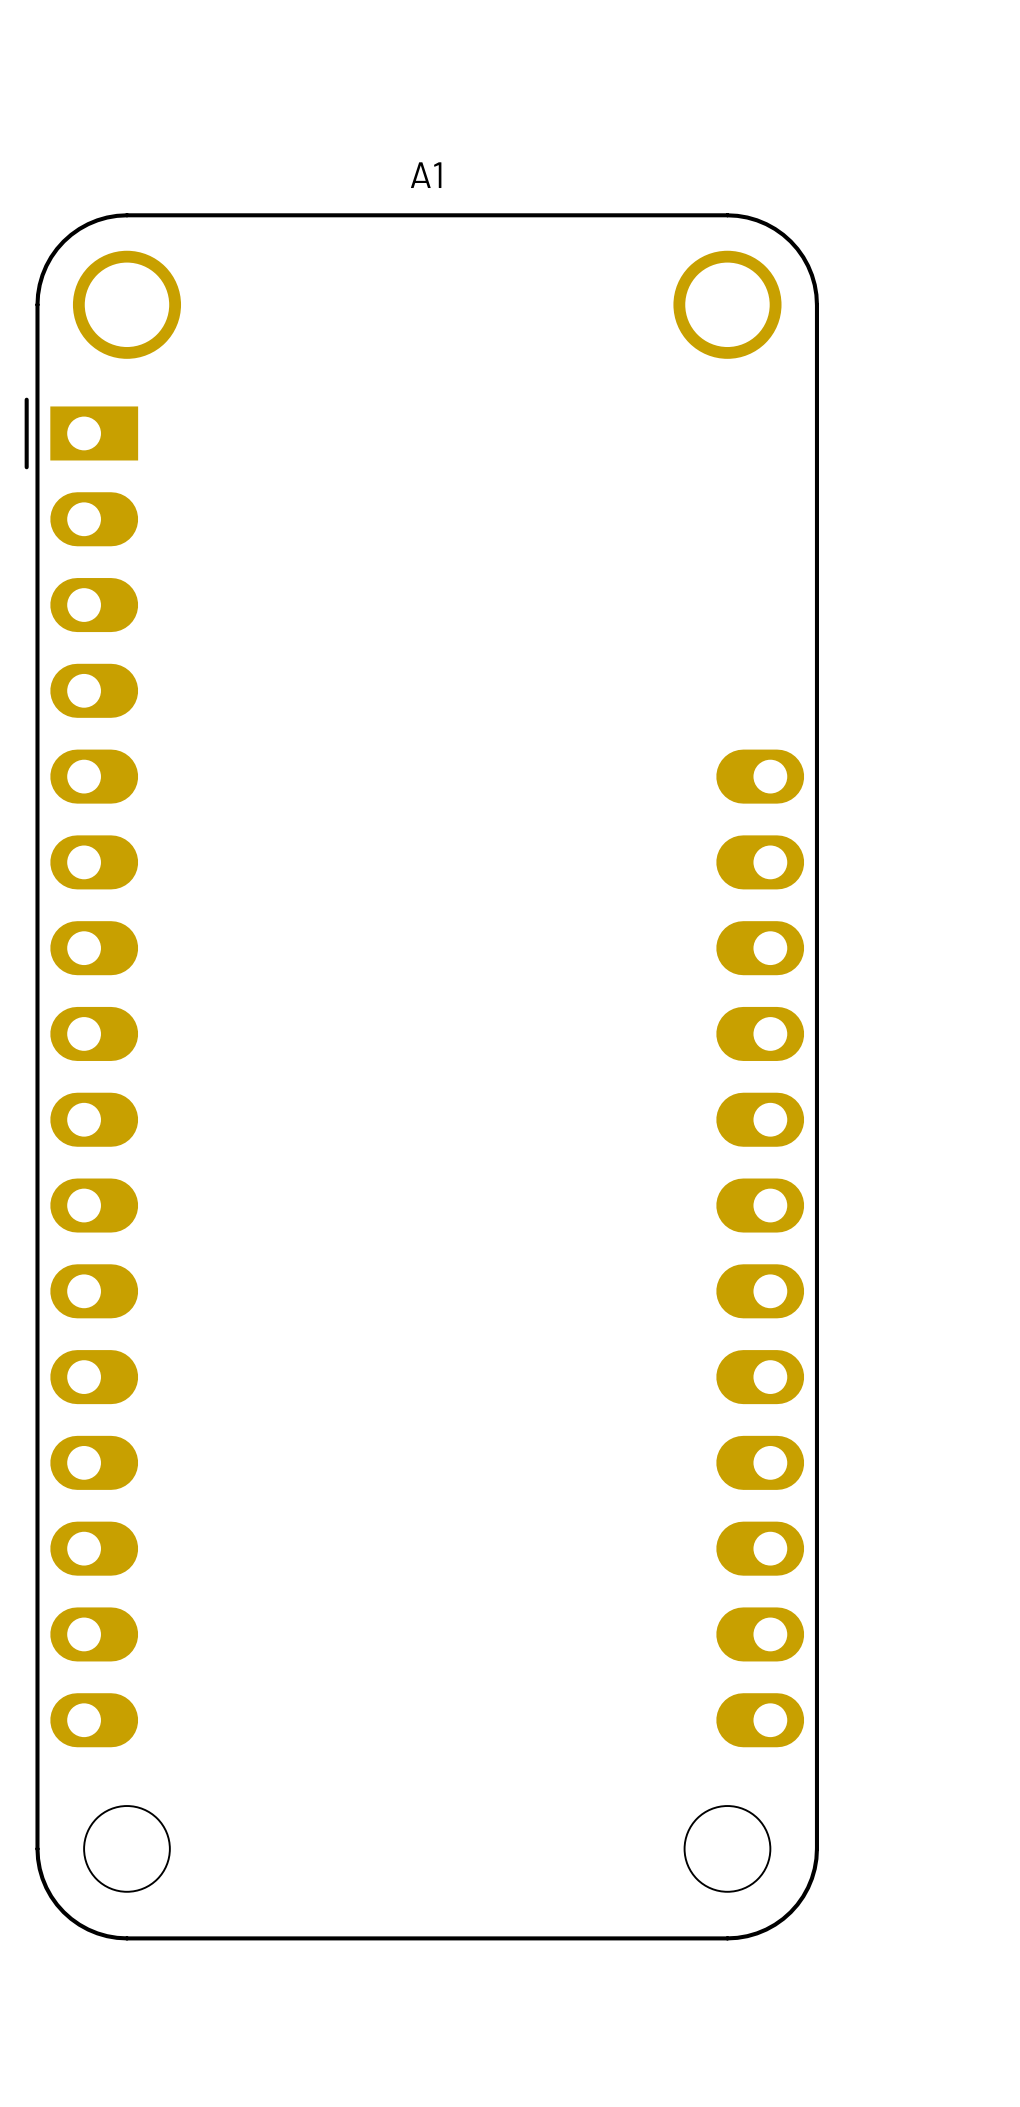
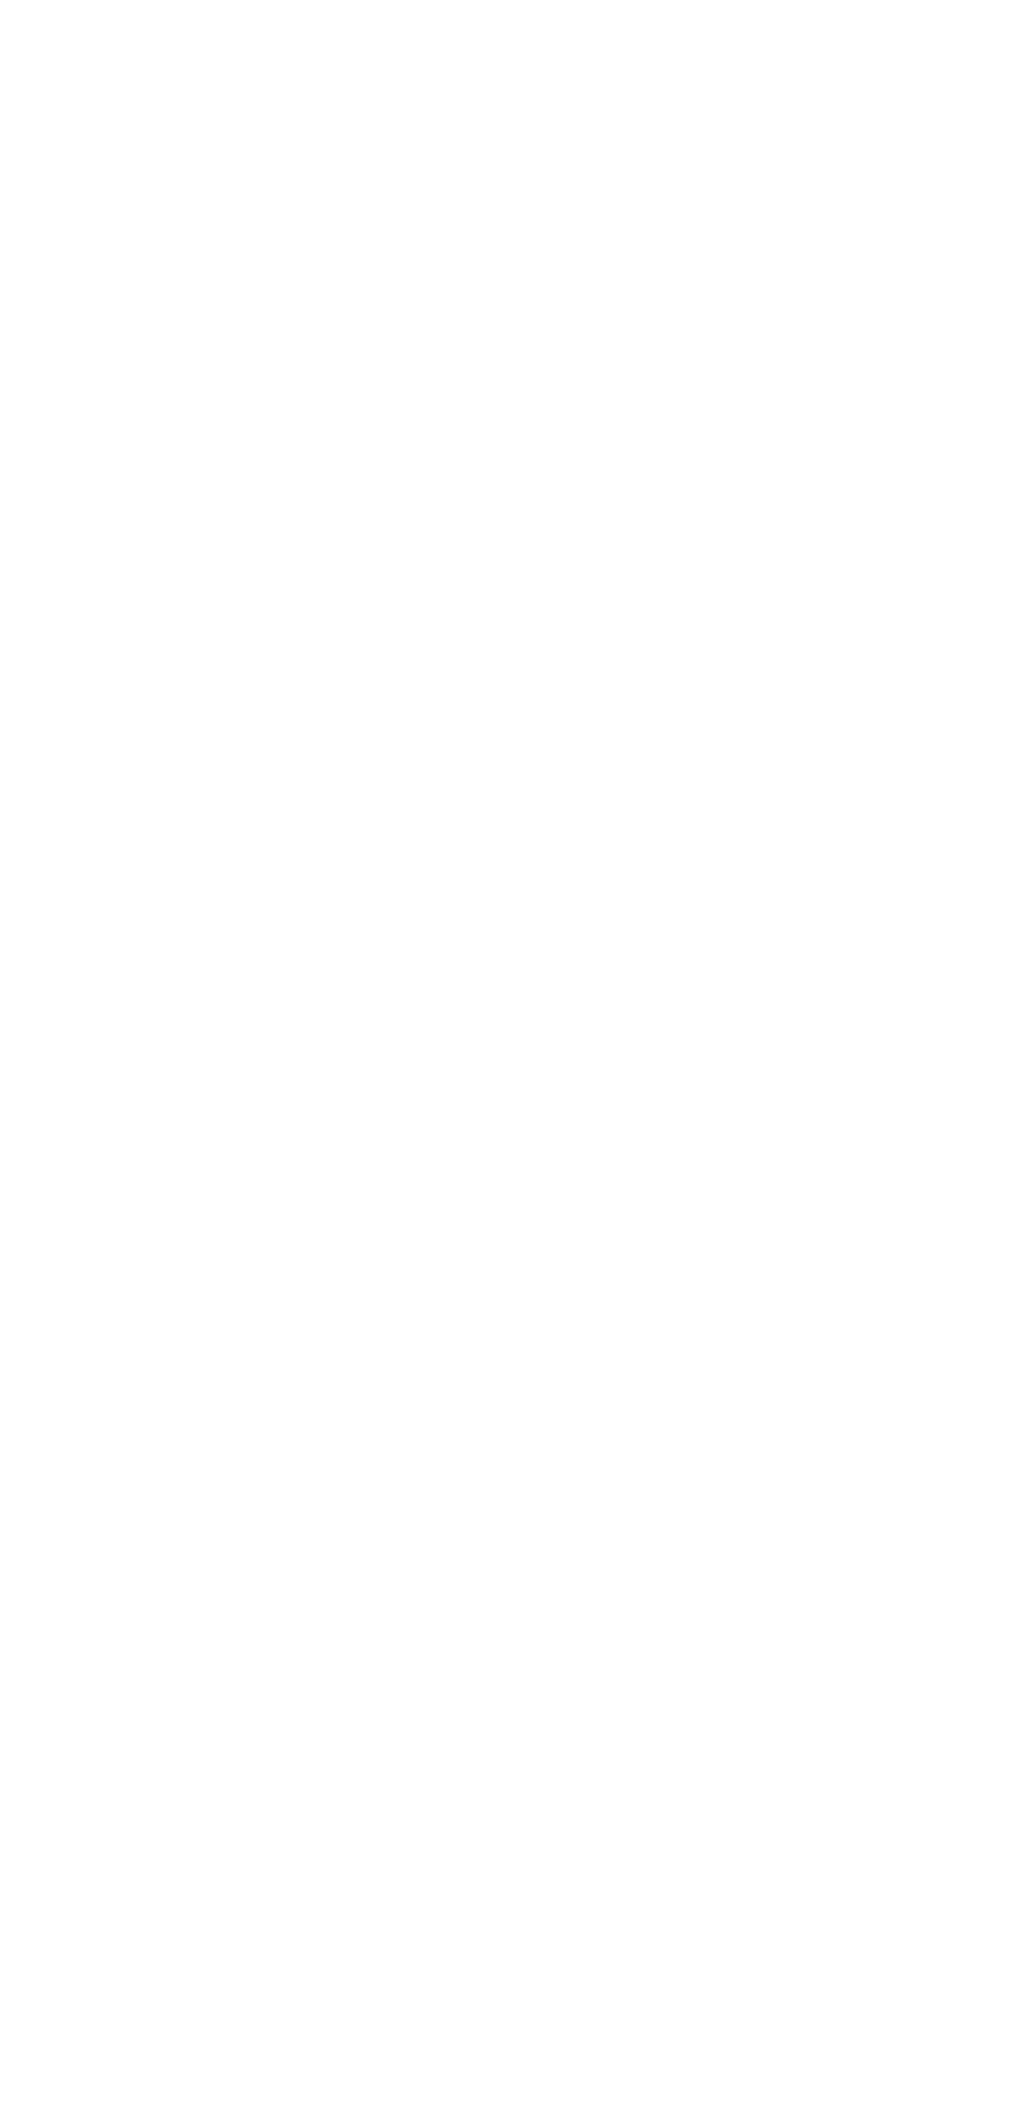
A1: (421, 1076) -> none

